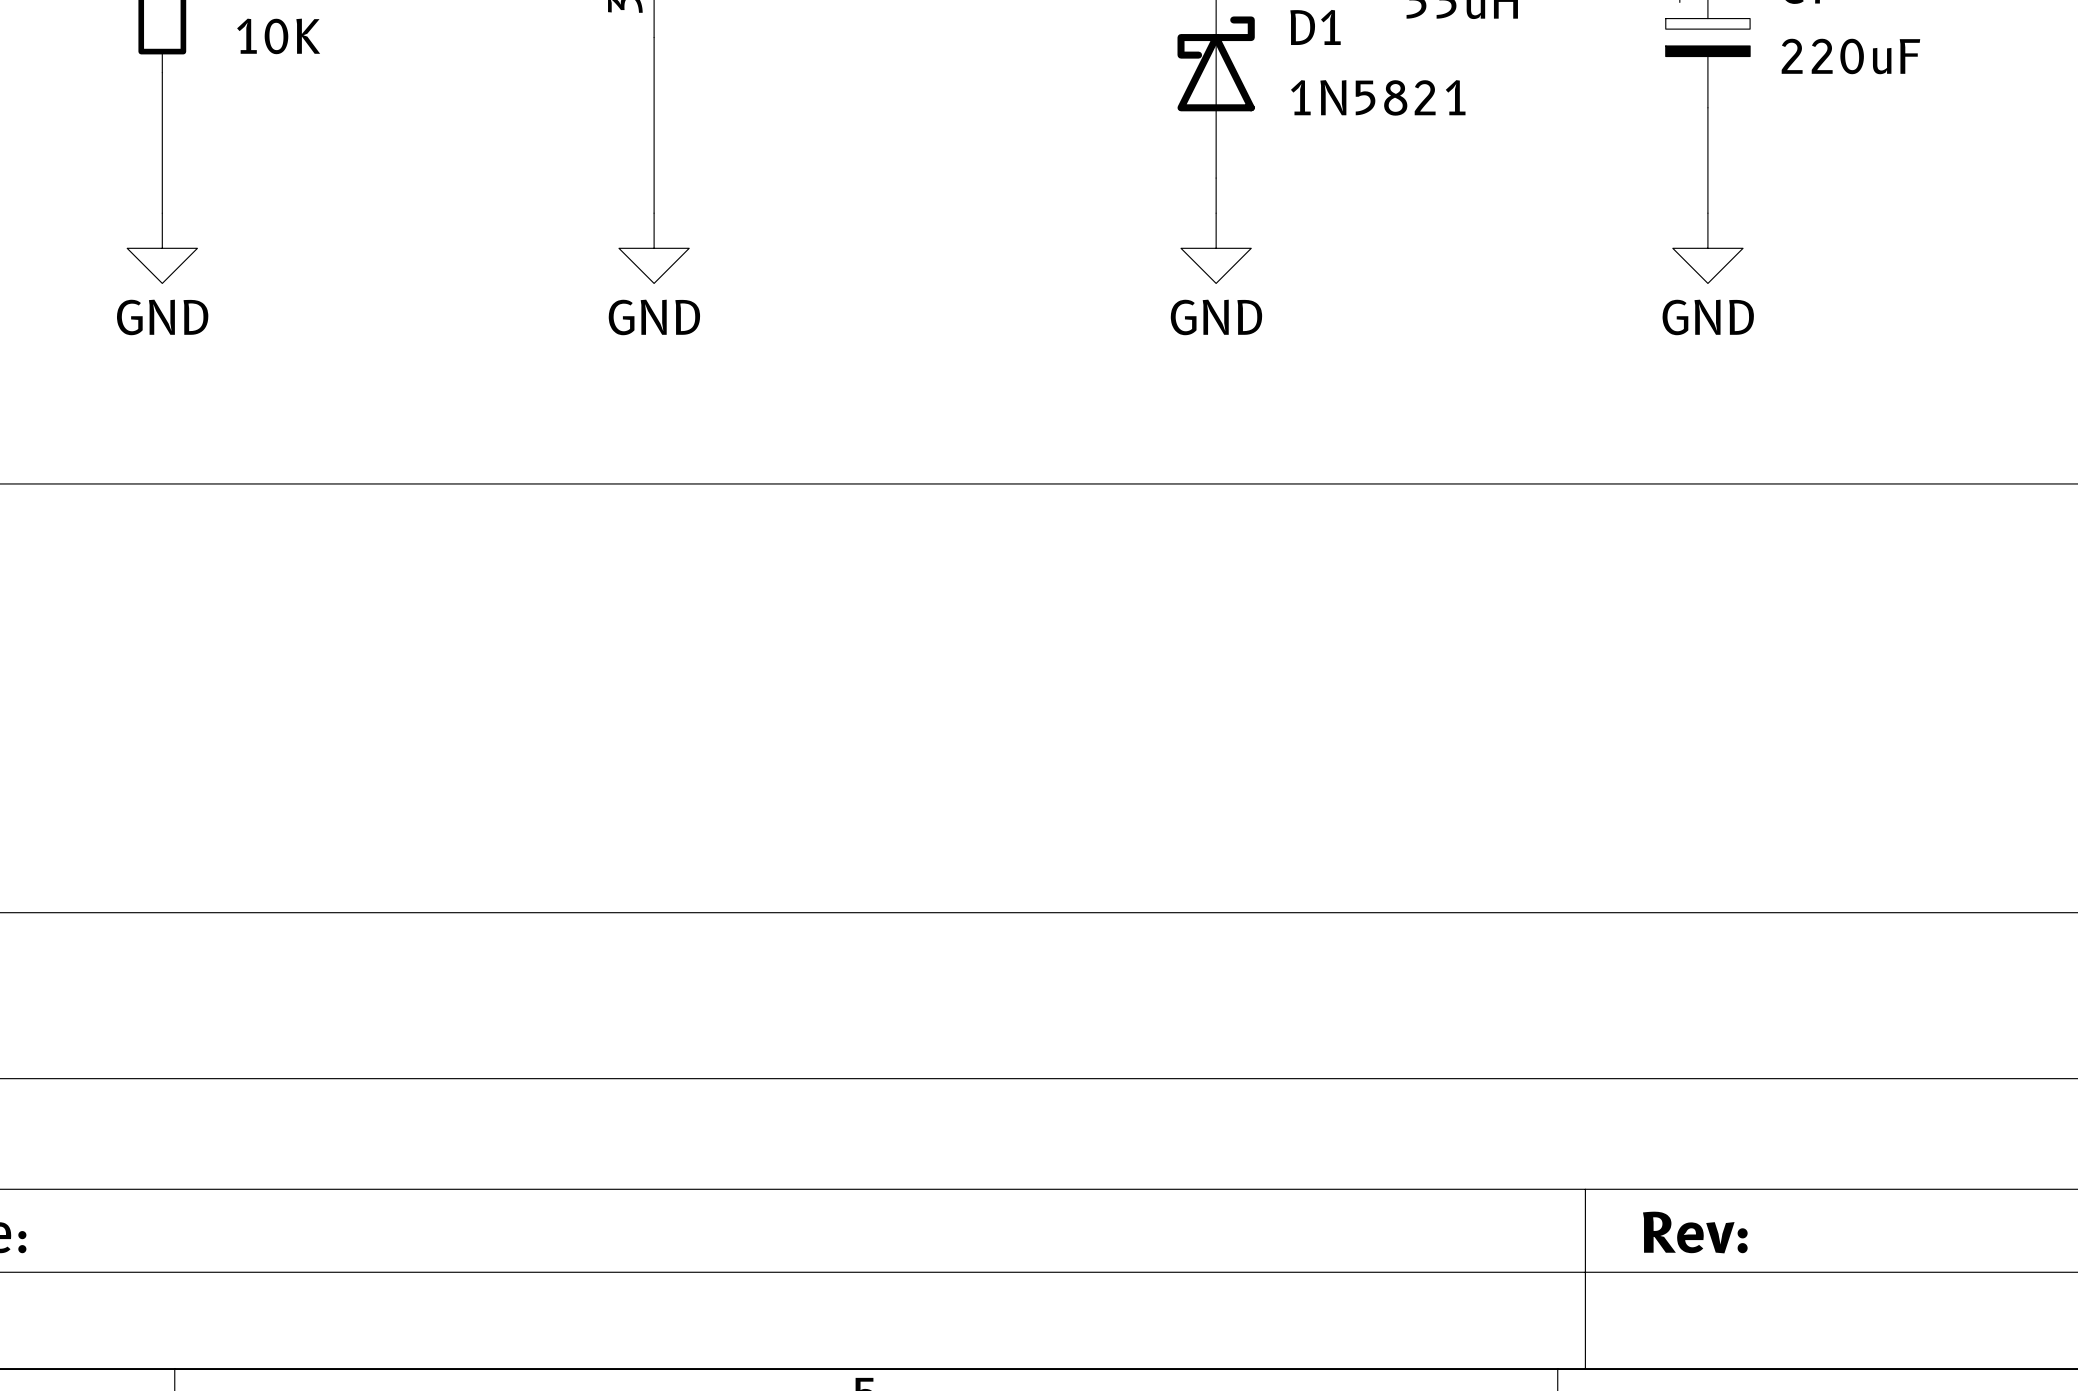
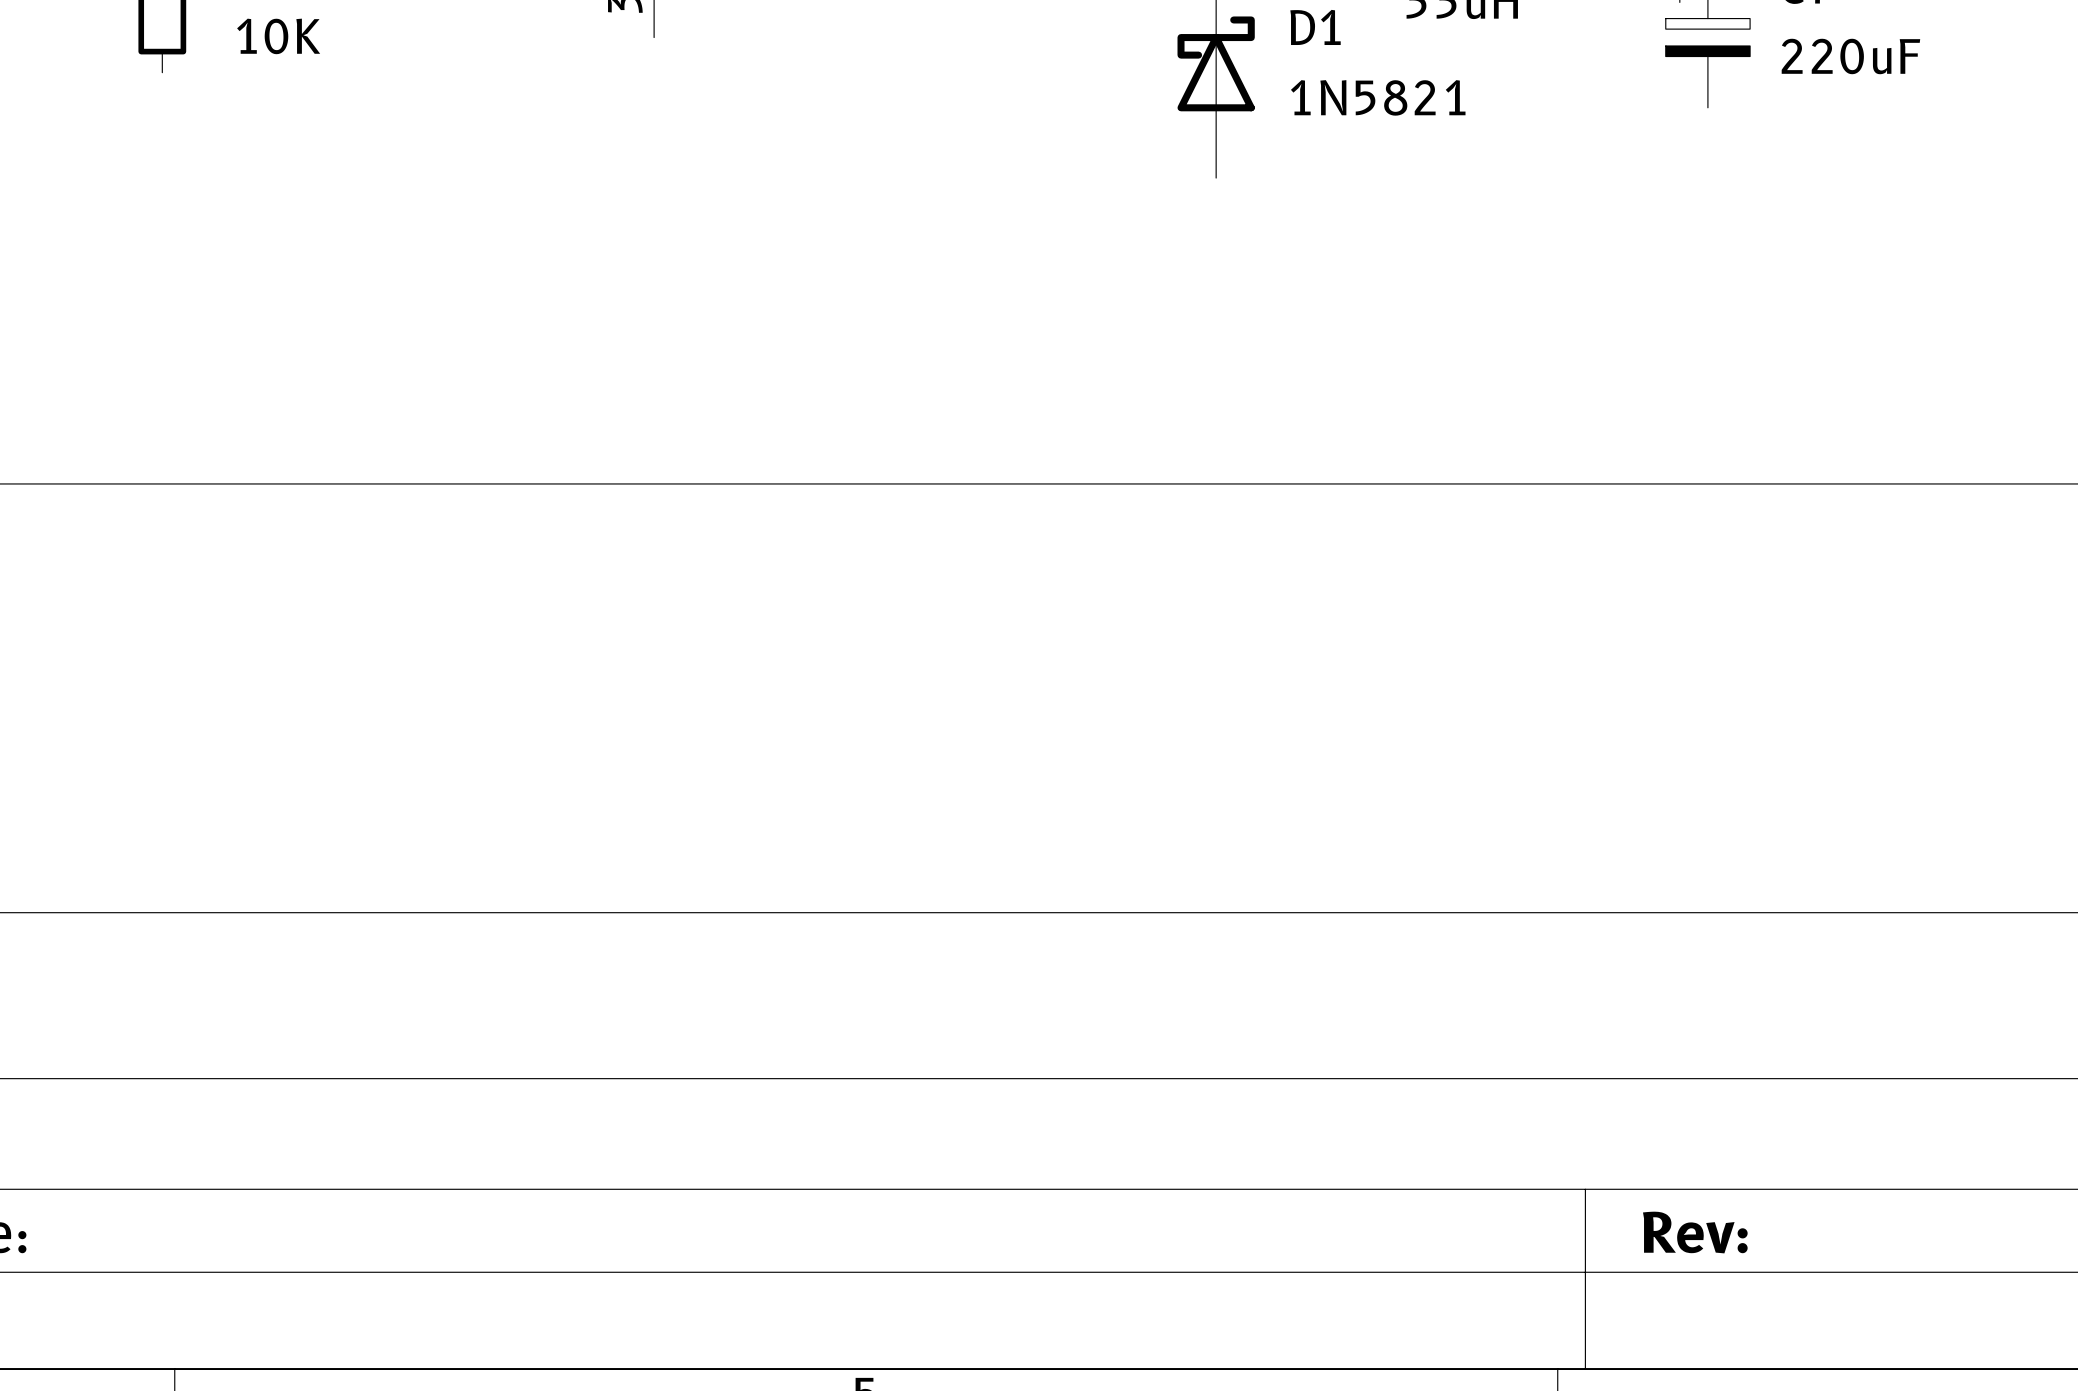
wire: (654, 37) (654, 213) -> none
wire: (162, 72) (162, 213) -> none
wire: (1707, 107) (1707, 213) -> none
wire: (1216, 178) (1216, 213) -> none
power symbol: GND (162, 248) -> none
power symbol: GND (654, 248) -> none
power symbol: GND (1216, 248) -> none
power symbol: GND (1707, 248) -> none

